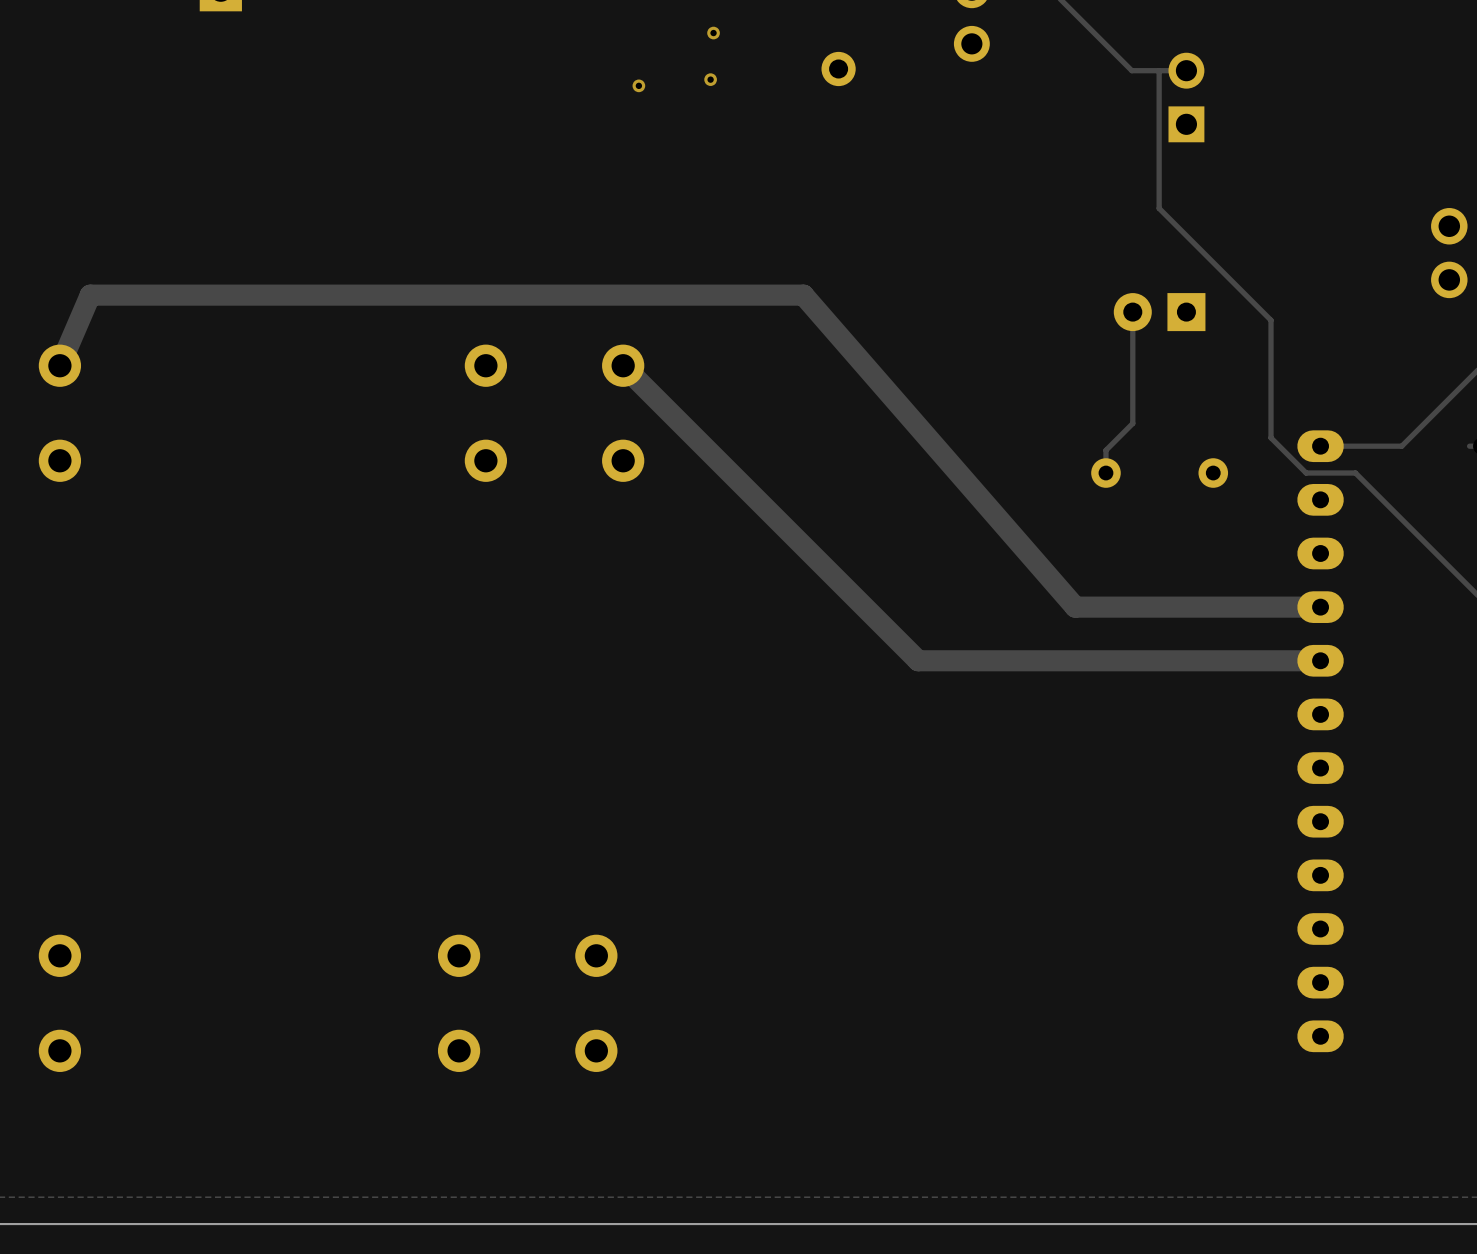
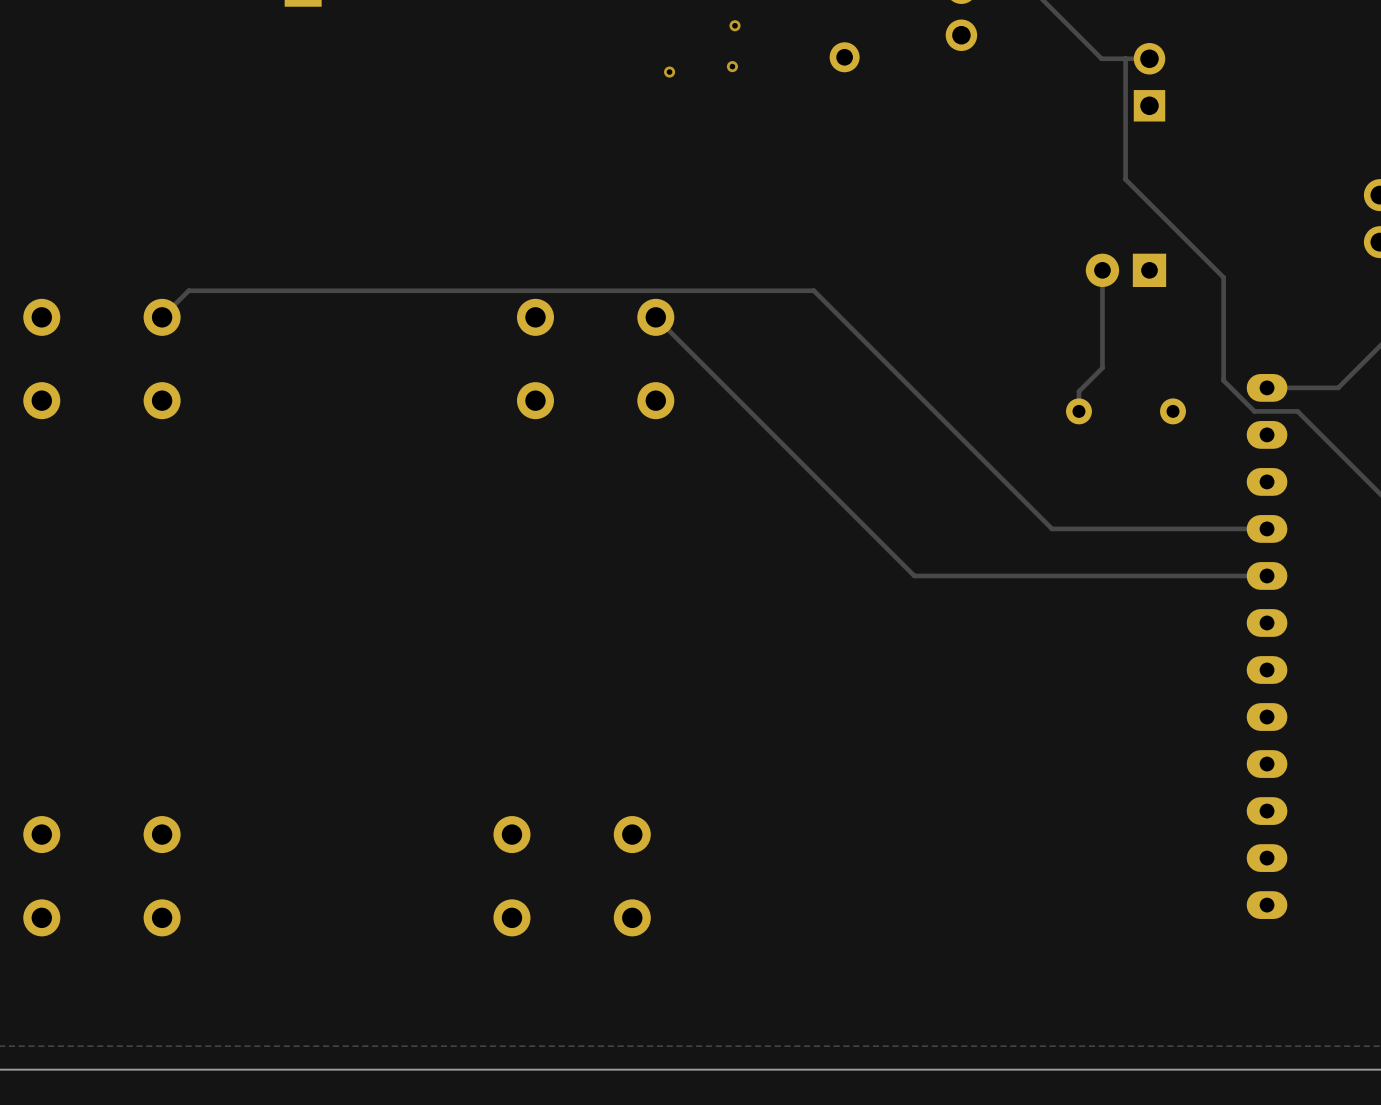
track: (59, 365) (90, 295) (803, 295) (1075, 607) -> (162, 317) (188, 290) (813, 290) (1052, 528)
track width: thick (623, 365) (918, 660) (1320, 660) -> thin (655, 317) (914, 575) (1267, 575)
track width: thick (1320, 607) (1075, 607) -> thin (1267, 528) (1052, 528)

